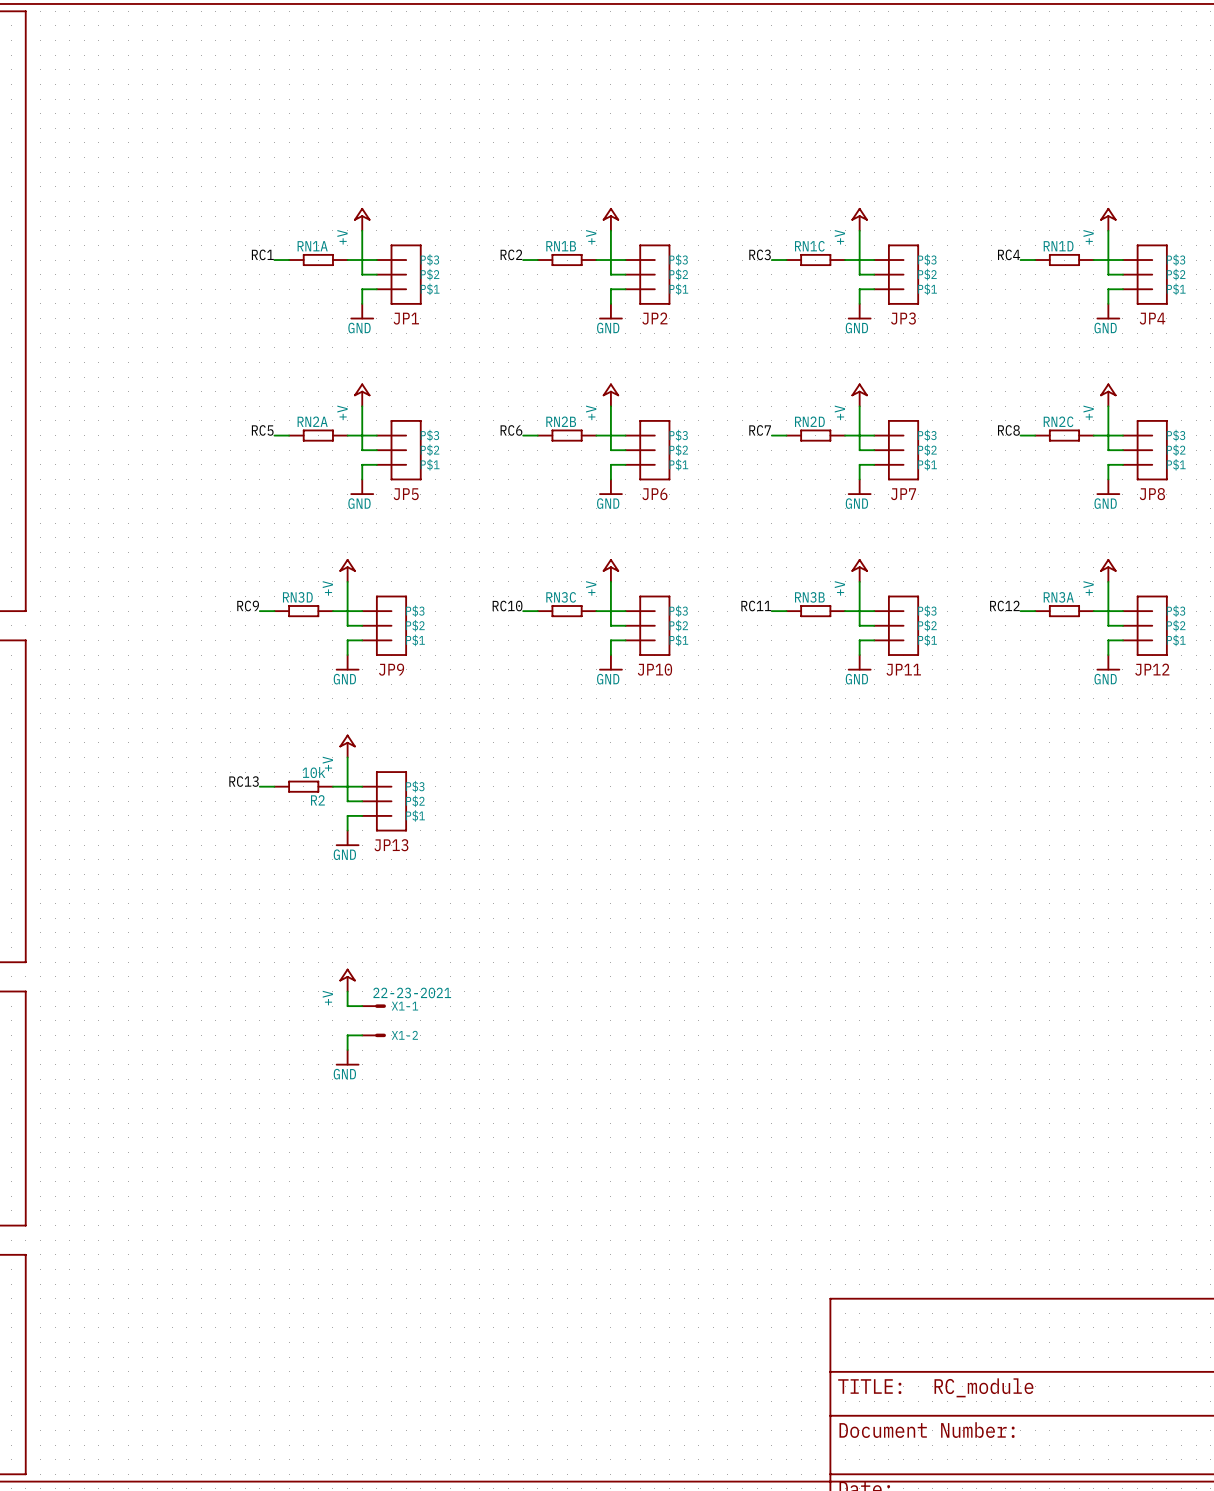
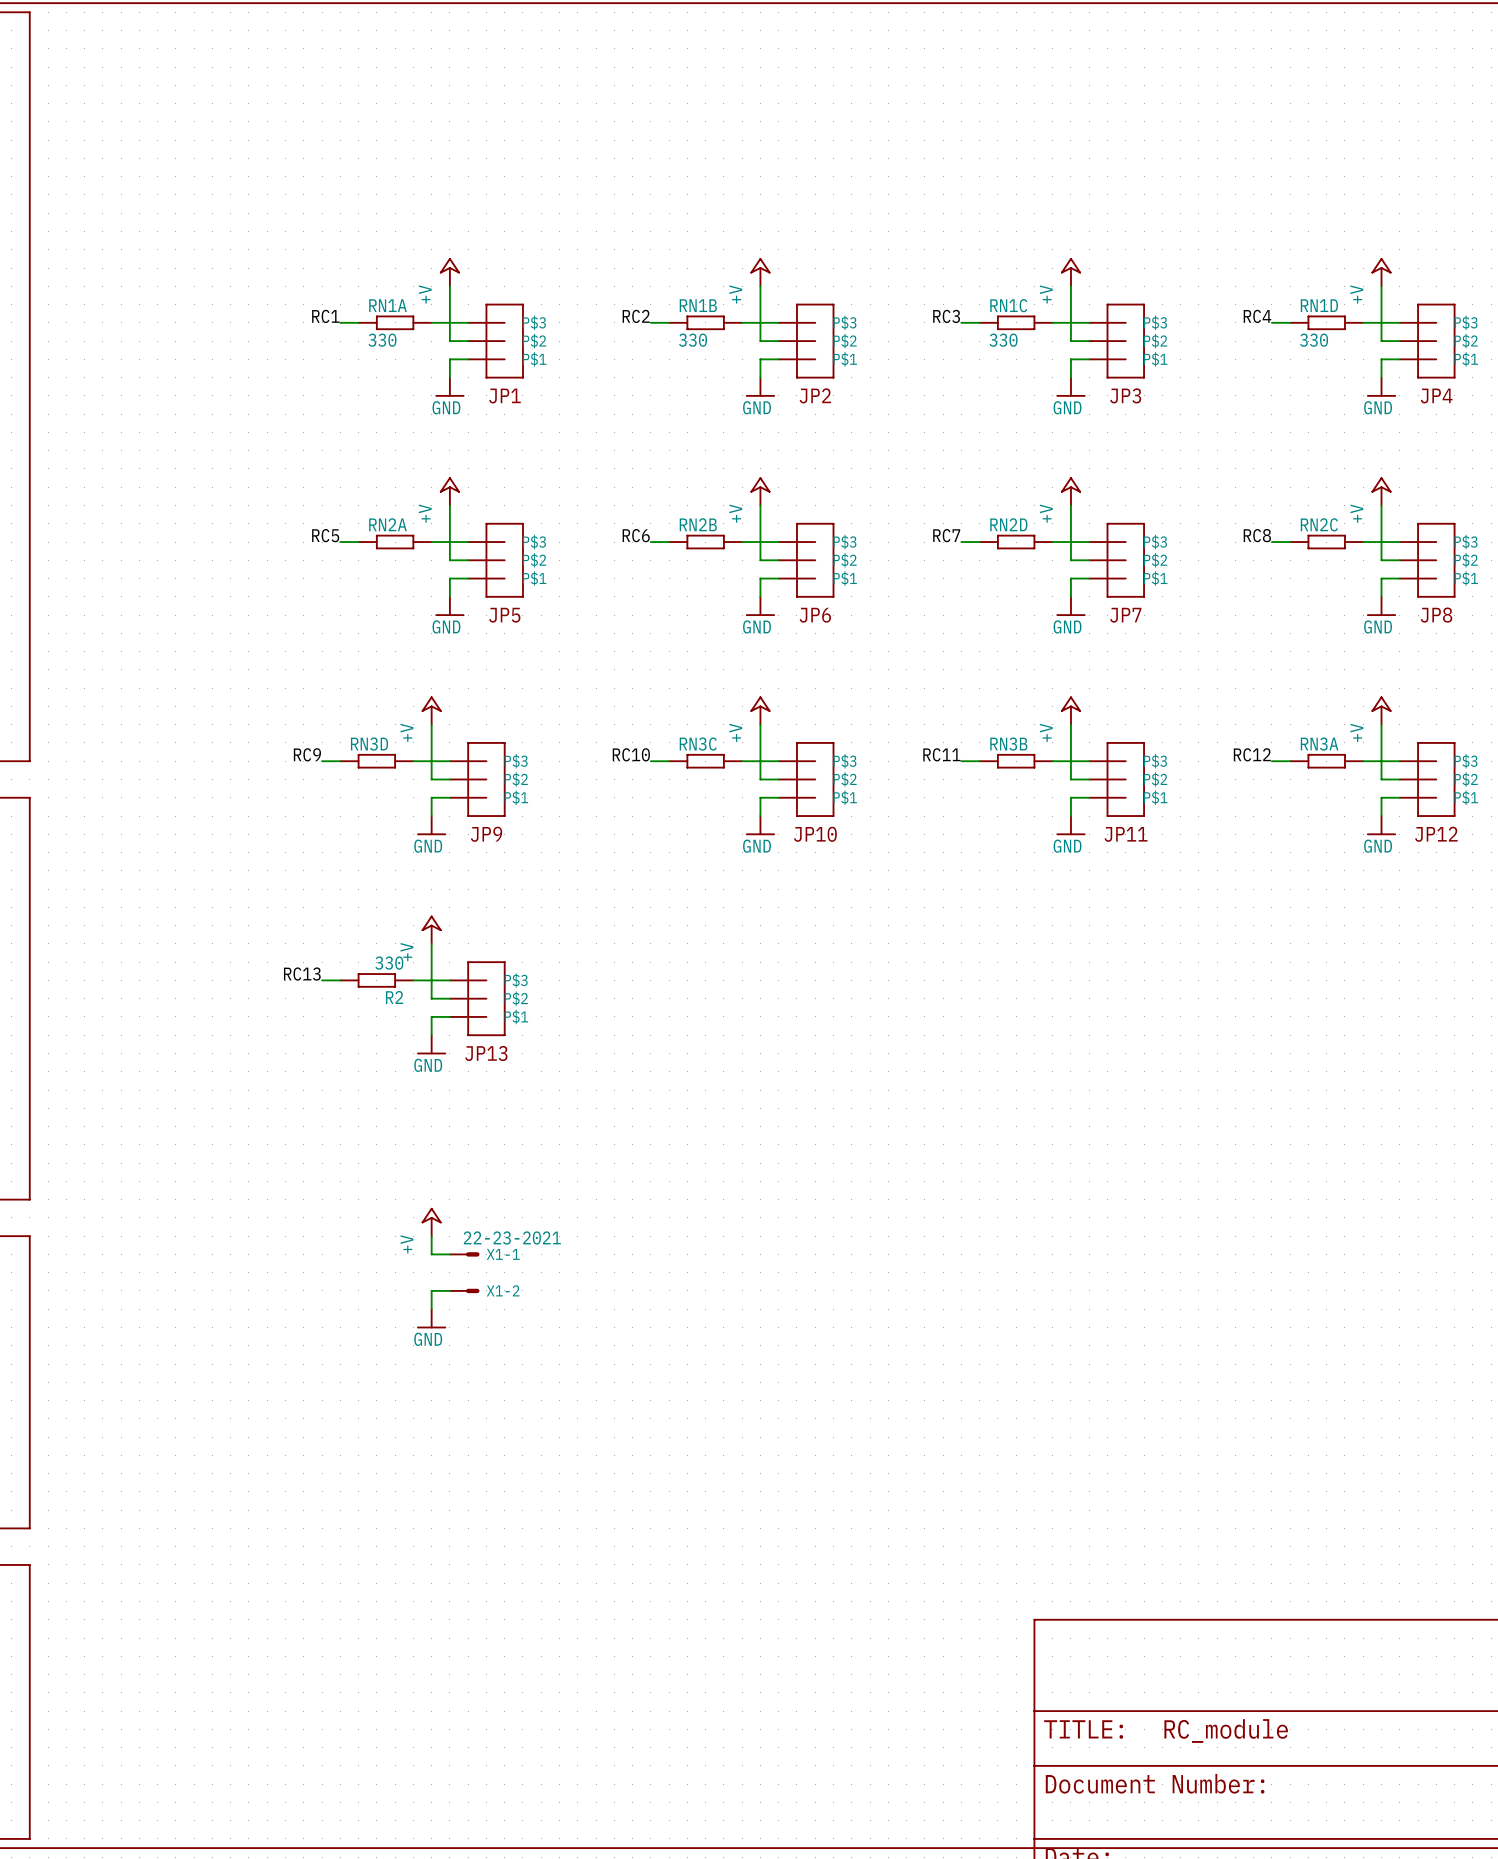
RN1A value: none -> 330 (382, 340)
RN1B value: none -> 330 (693, 340)
RN1C value: none -> 330 (1003, 340)
RN1D value: none -> 330 (1314, 340)
R2 value: 10k (313, 772) -> 330 (389, 963)

